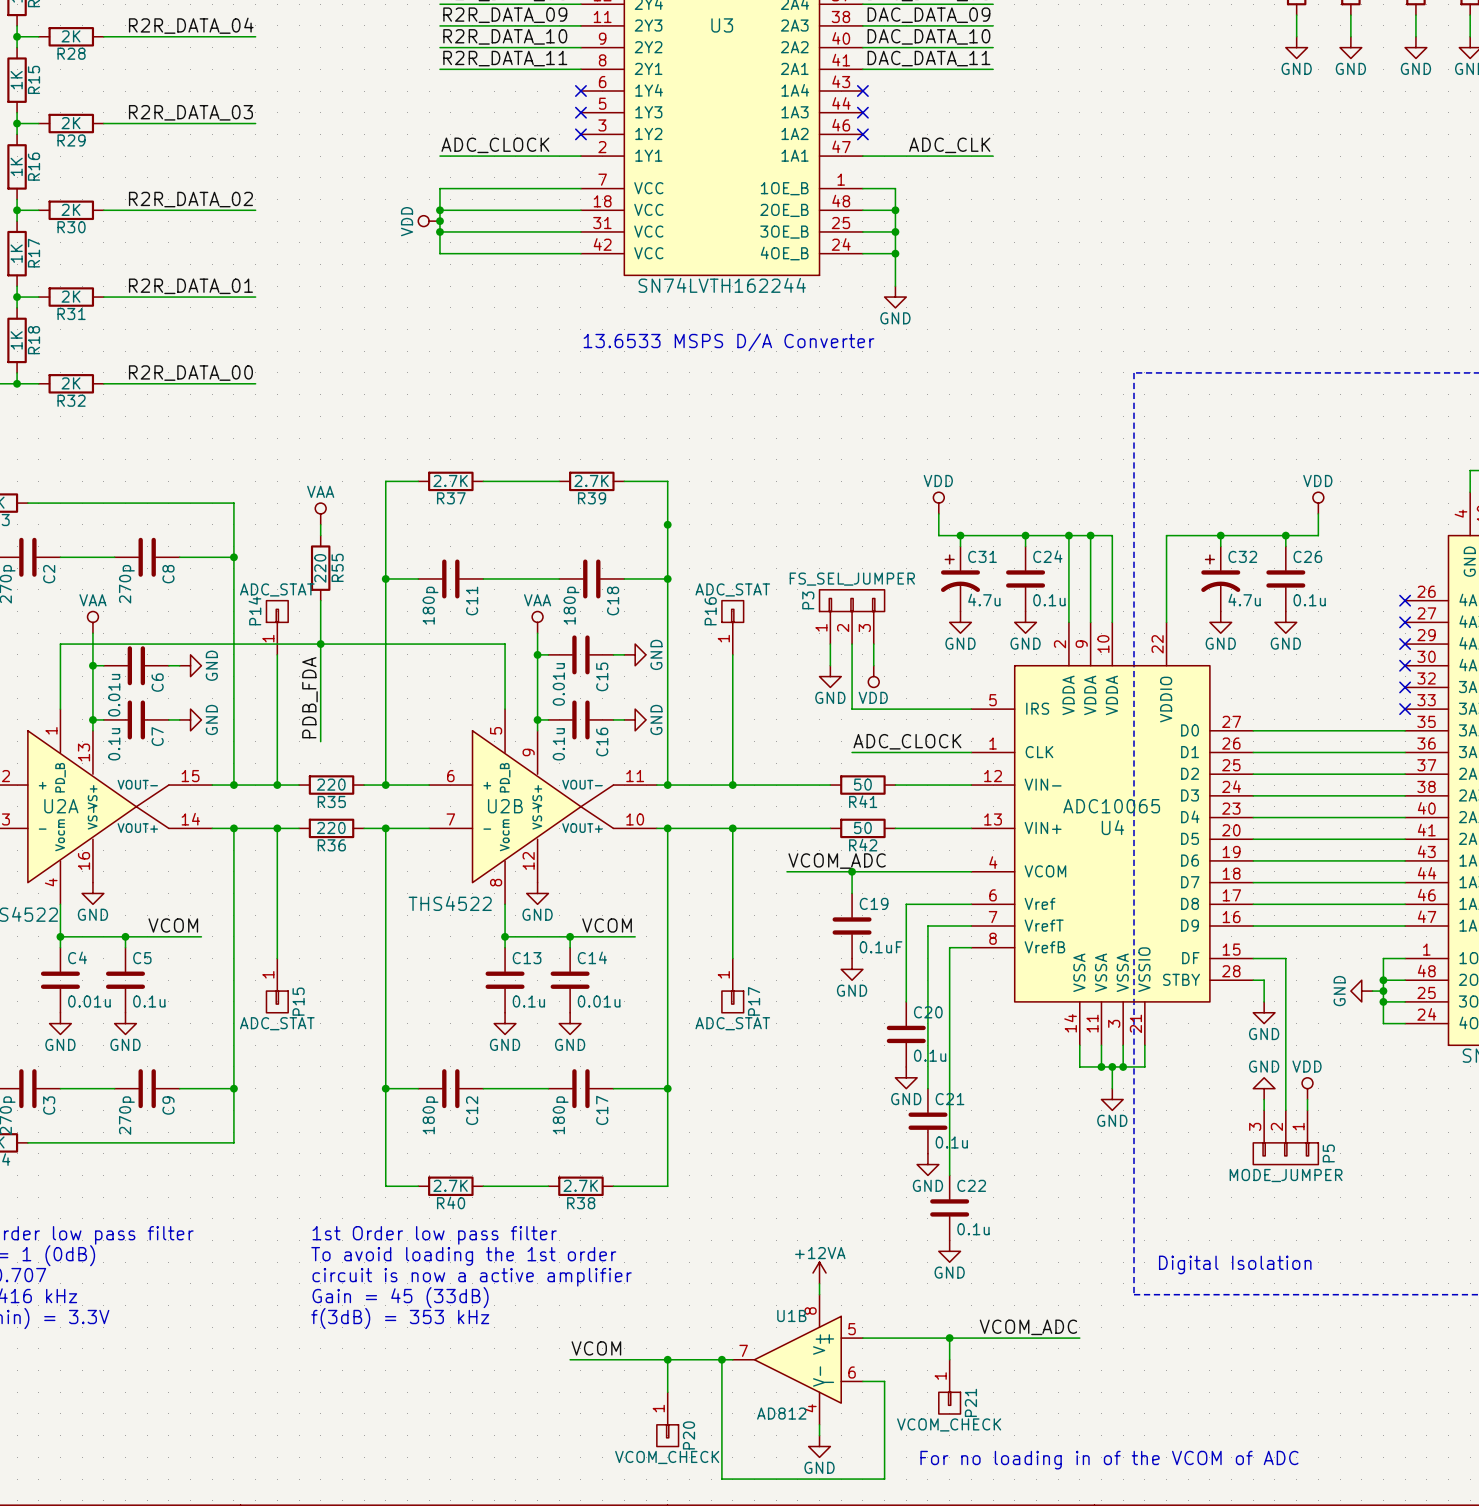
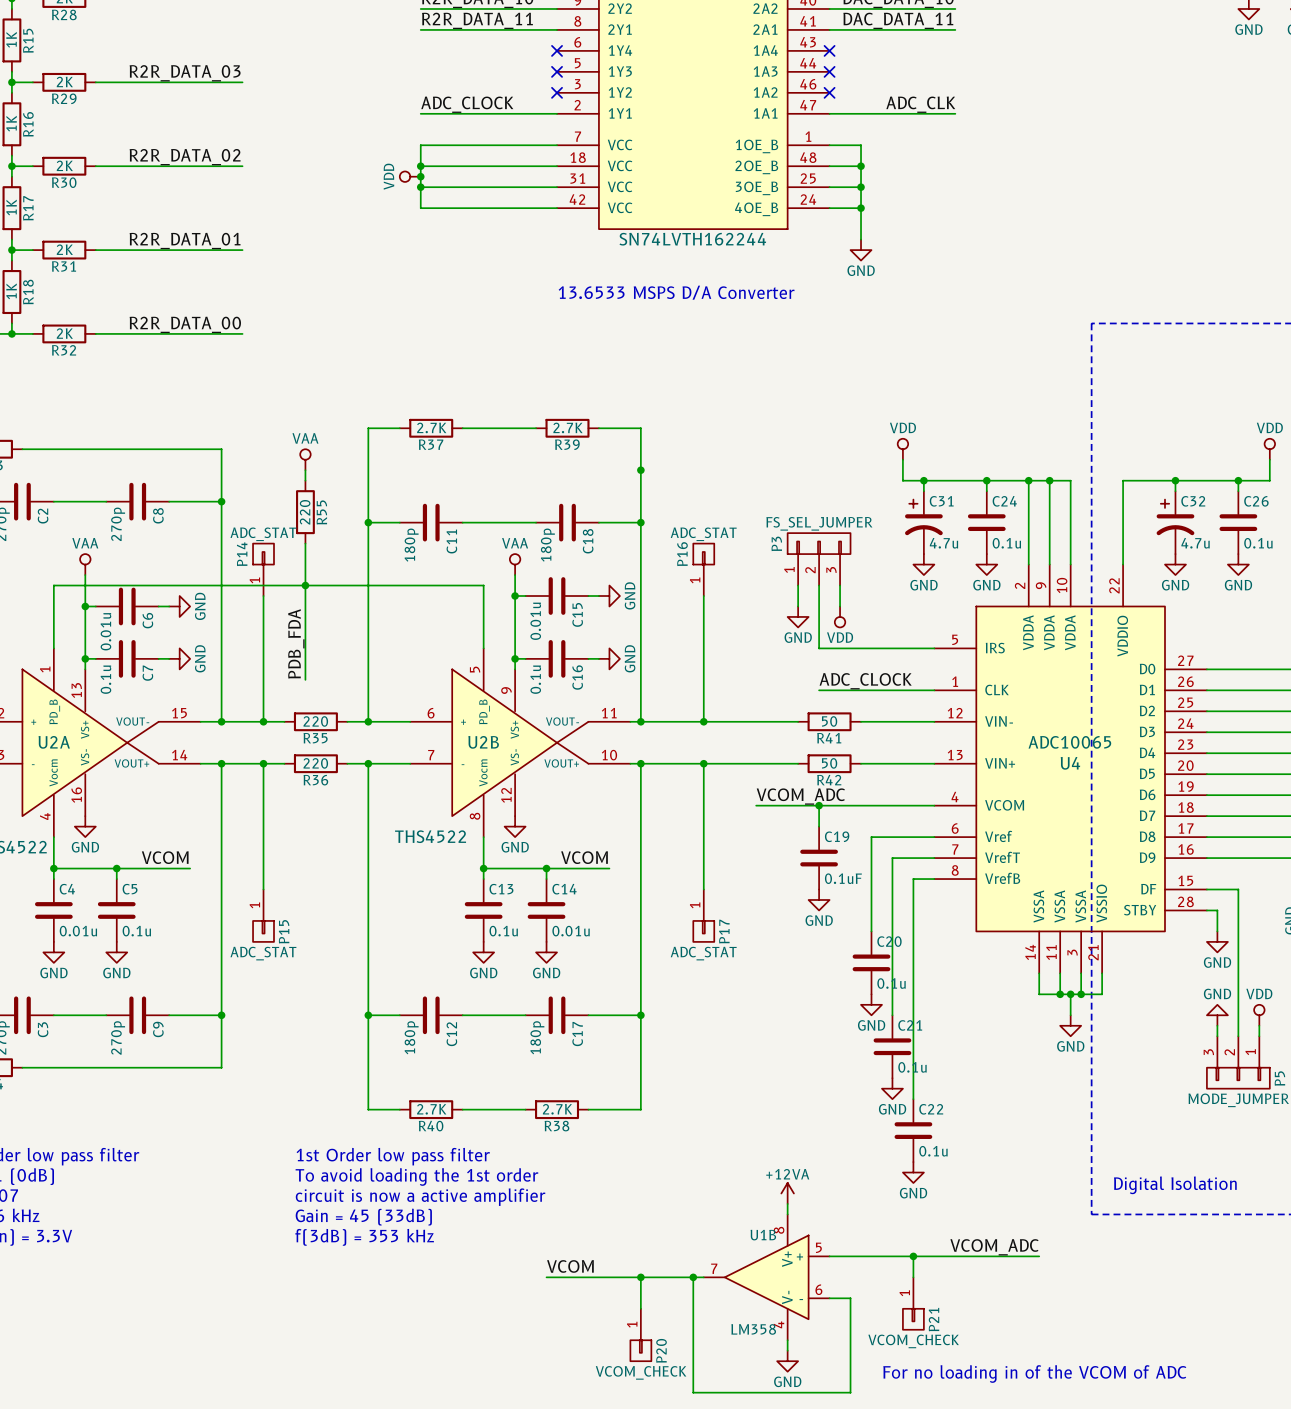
U1B value: AD812 (781, 1413) -> LM358 (753, 1329)

